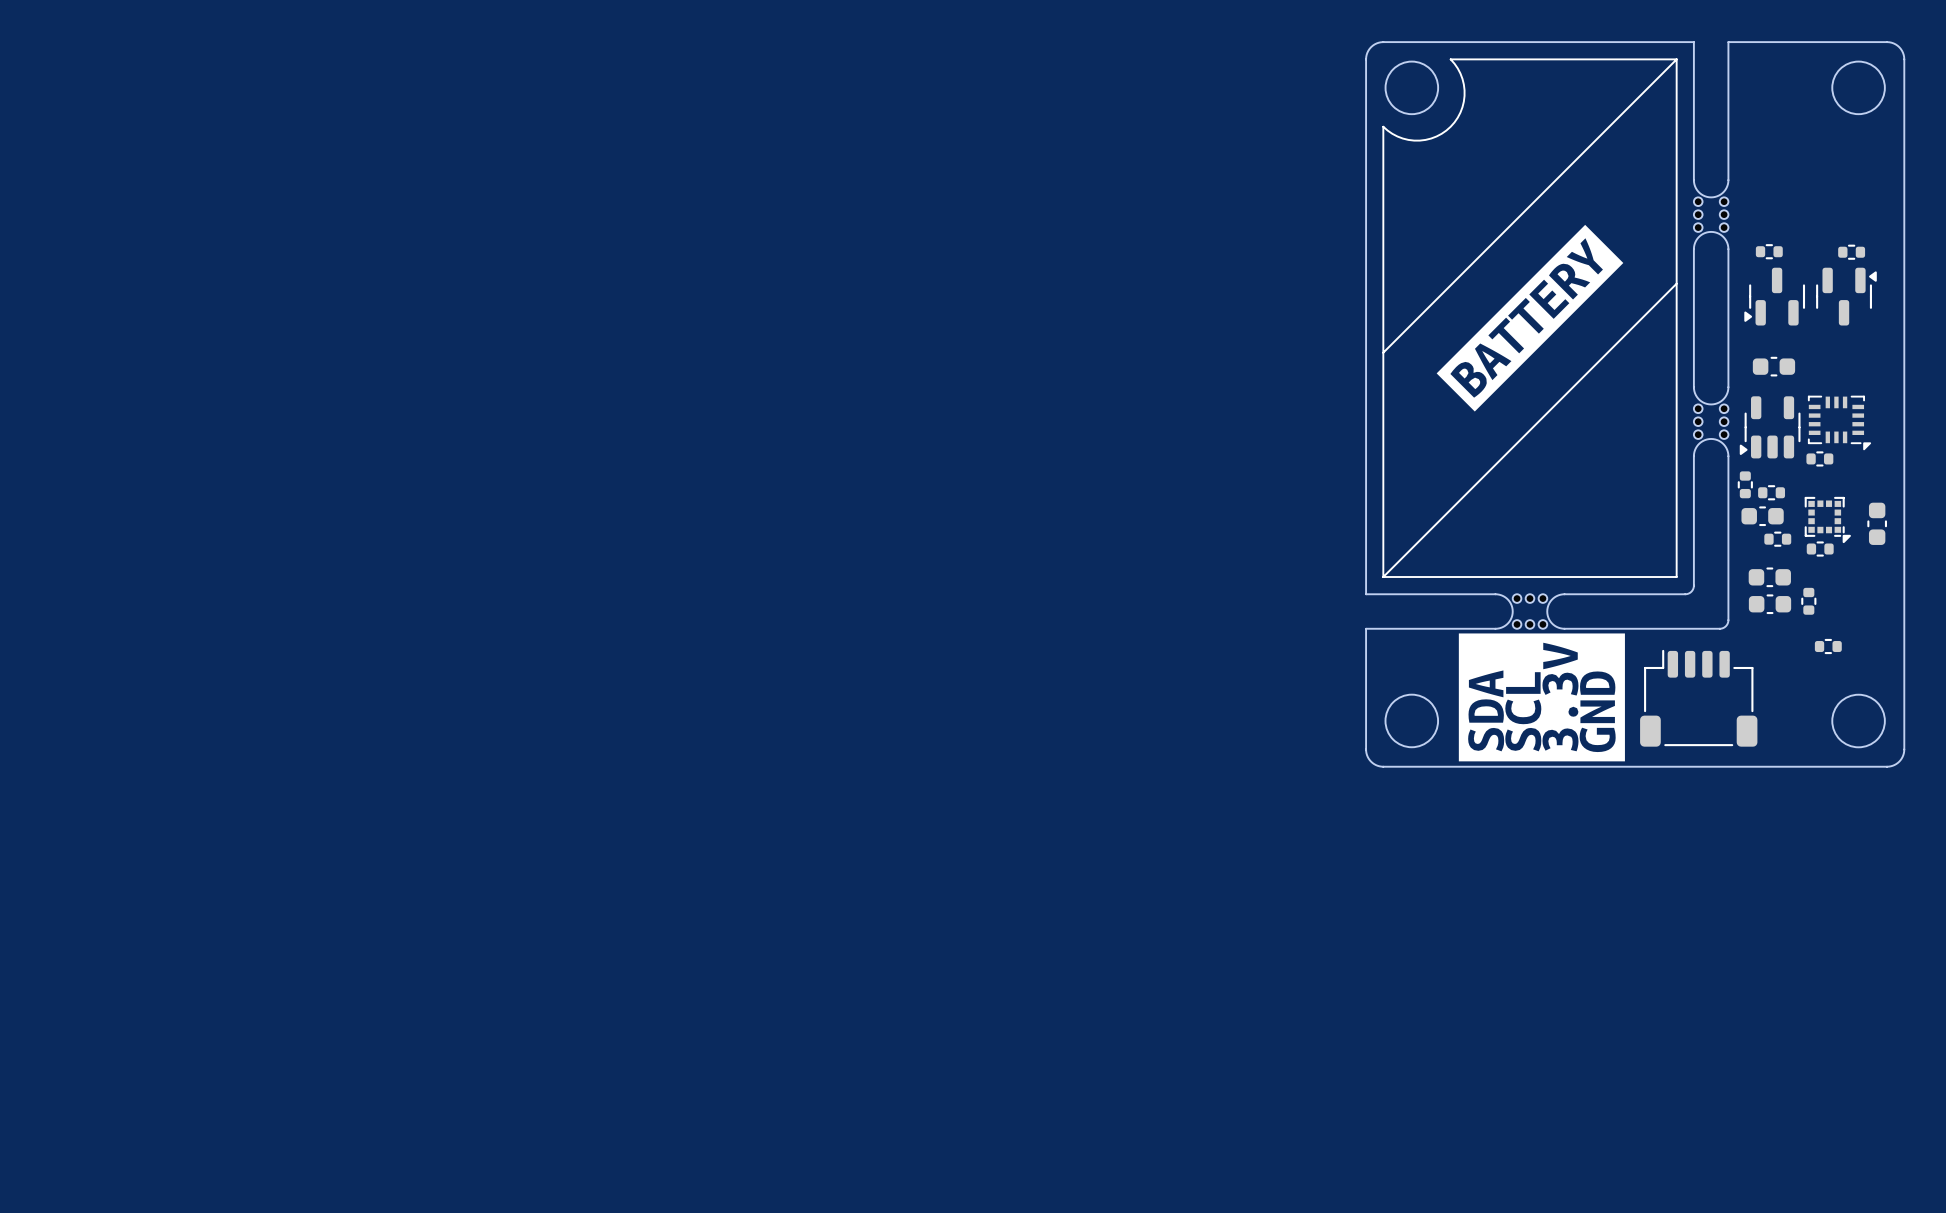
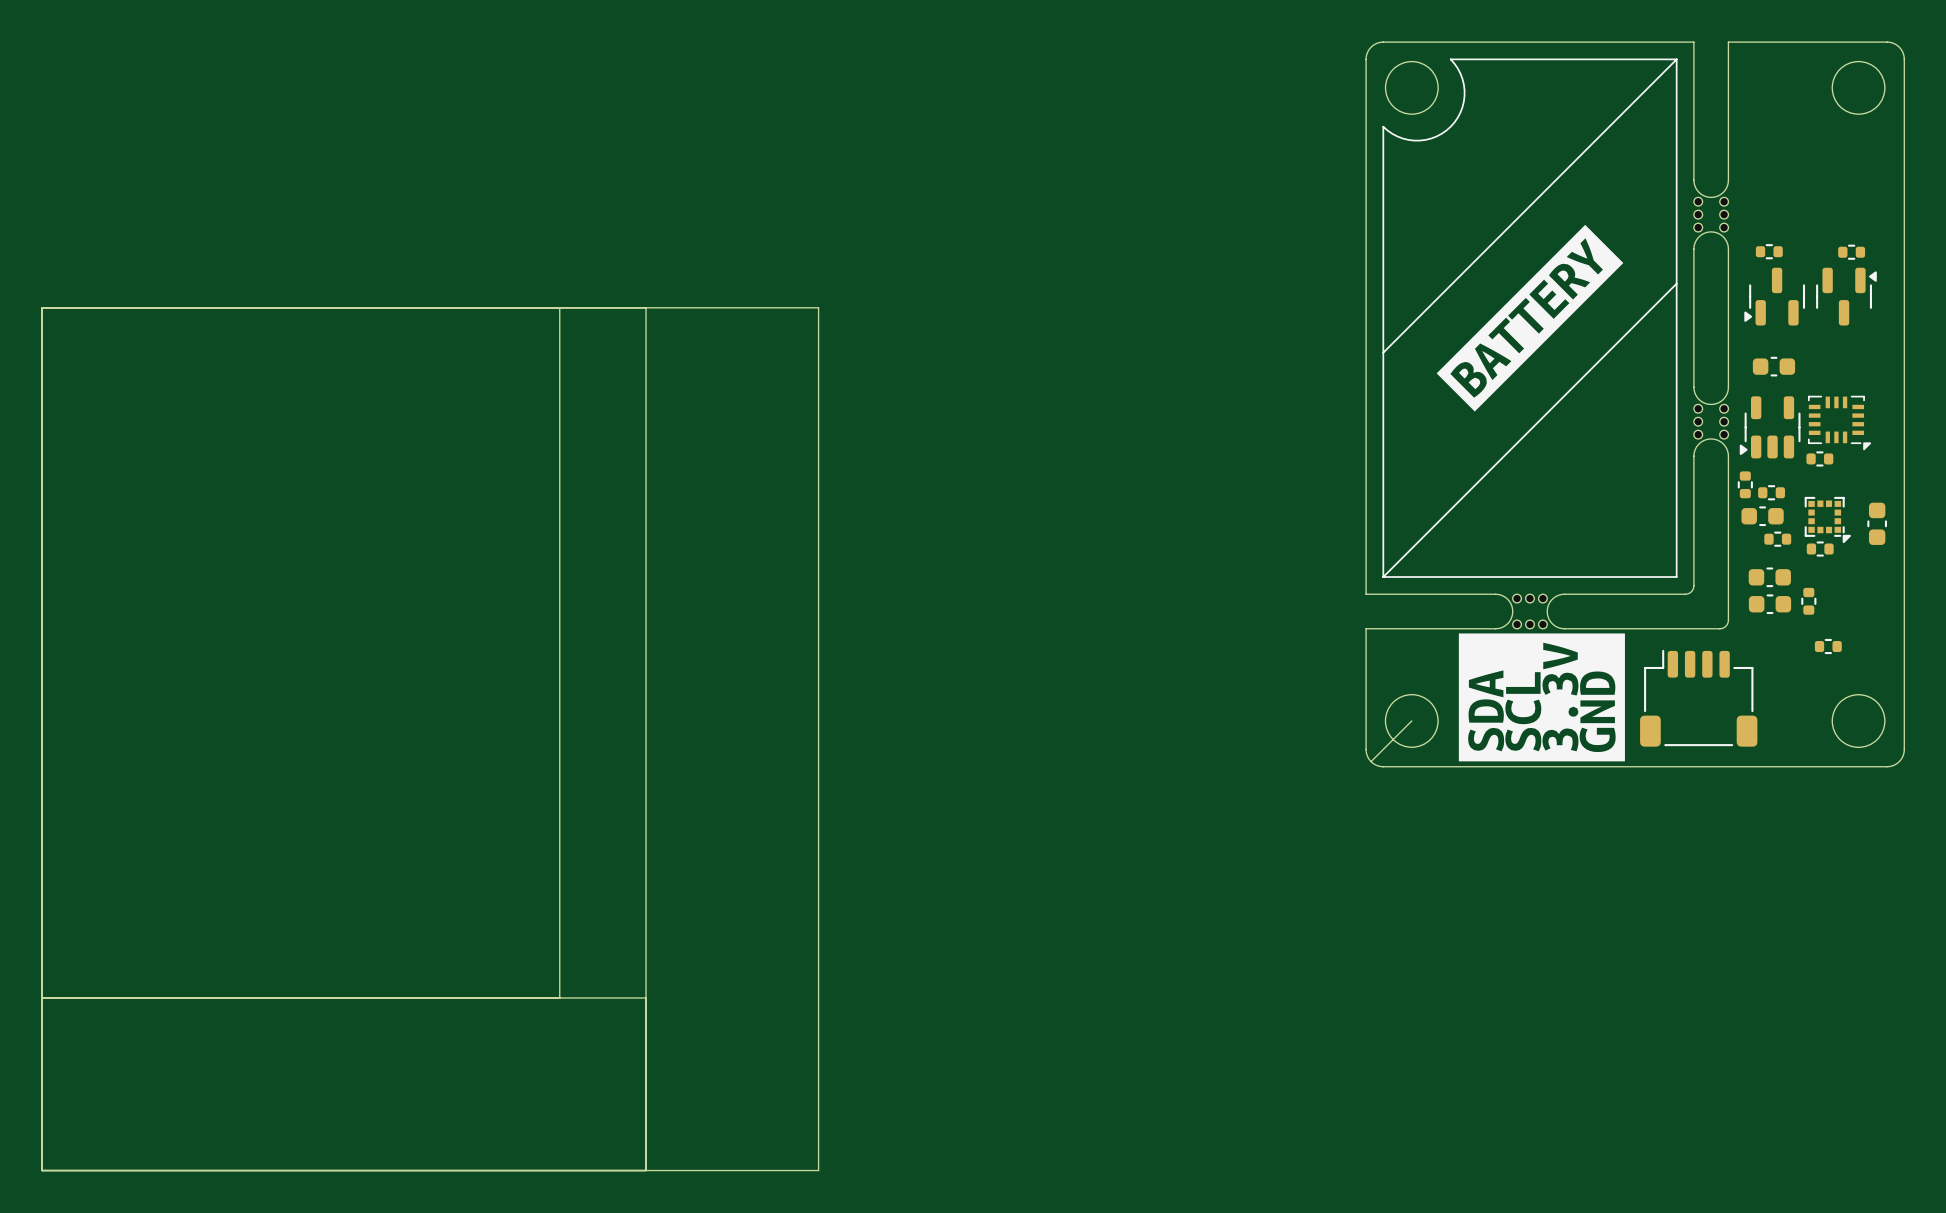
board edge: none -> (42, 307) (42, 1170) (818, 1170) (818, 307) (42, 307)
board edge: none -> (559, 307) (559, 997)
board edge: none -> (646, 307) (646, 1170)
board edge: none -> (1411, 720) (1371, 761)
board edge: none -> (42, 997) (646, 997)

